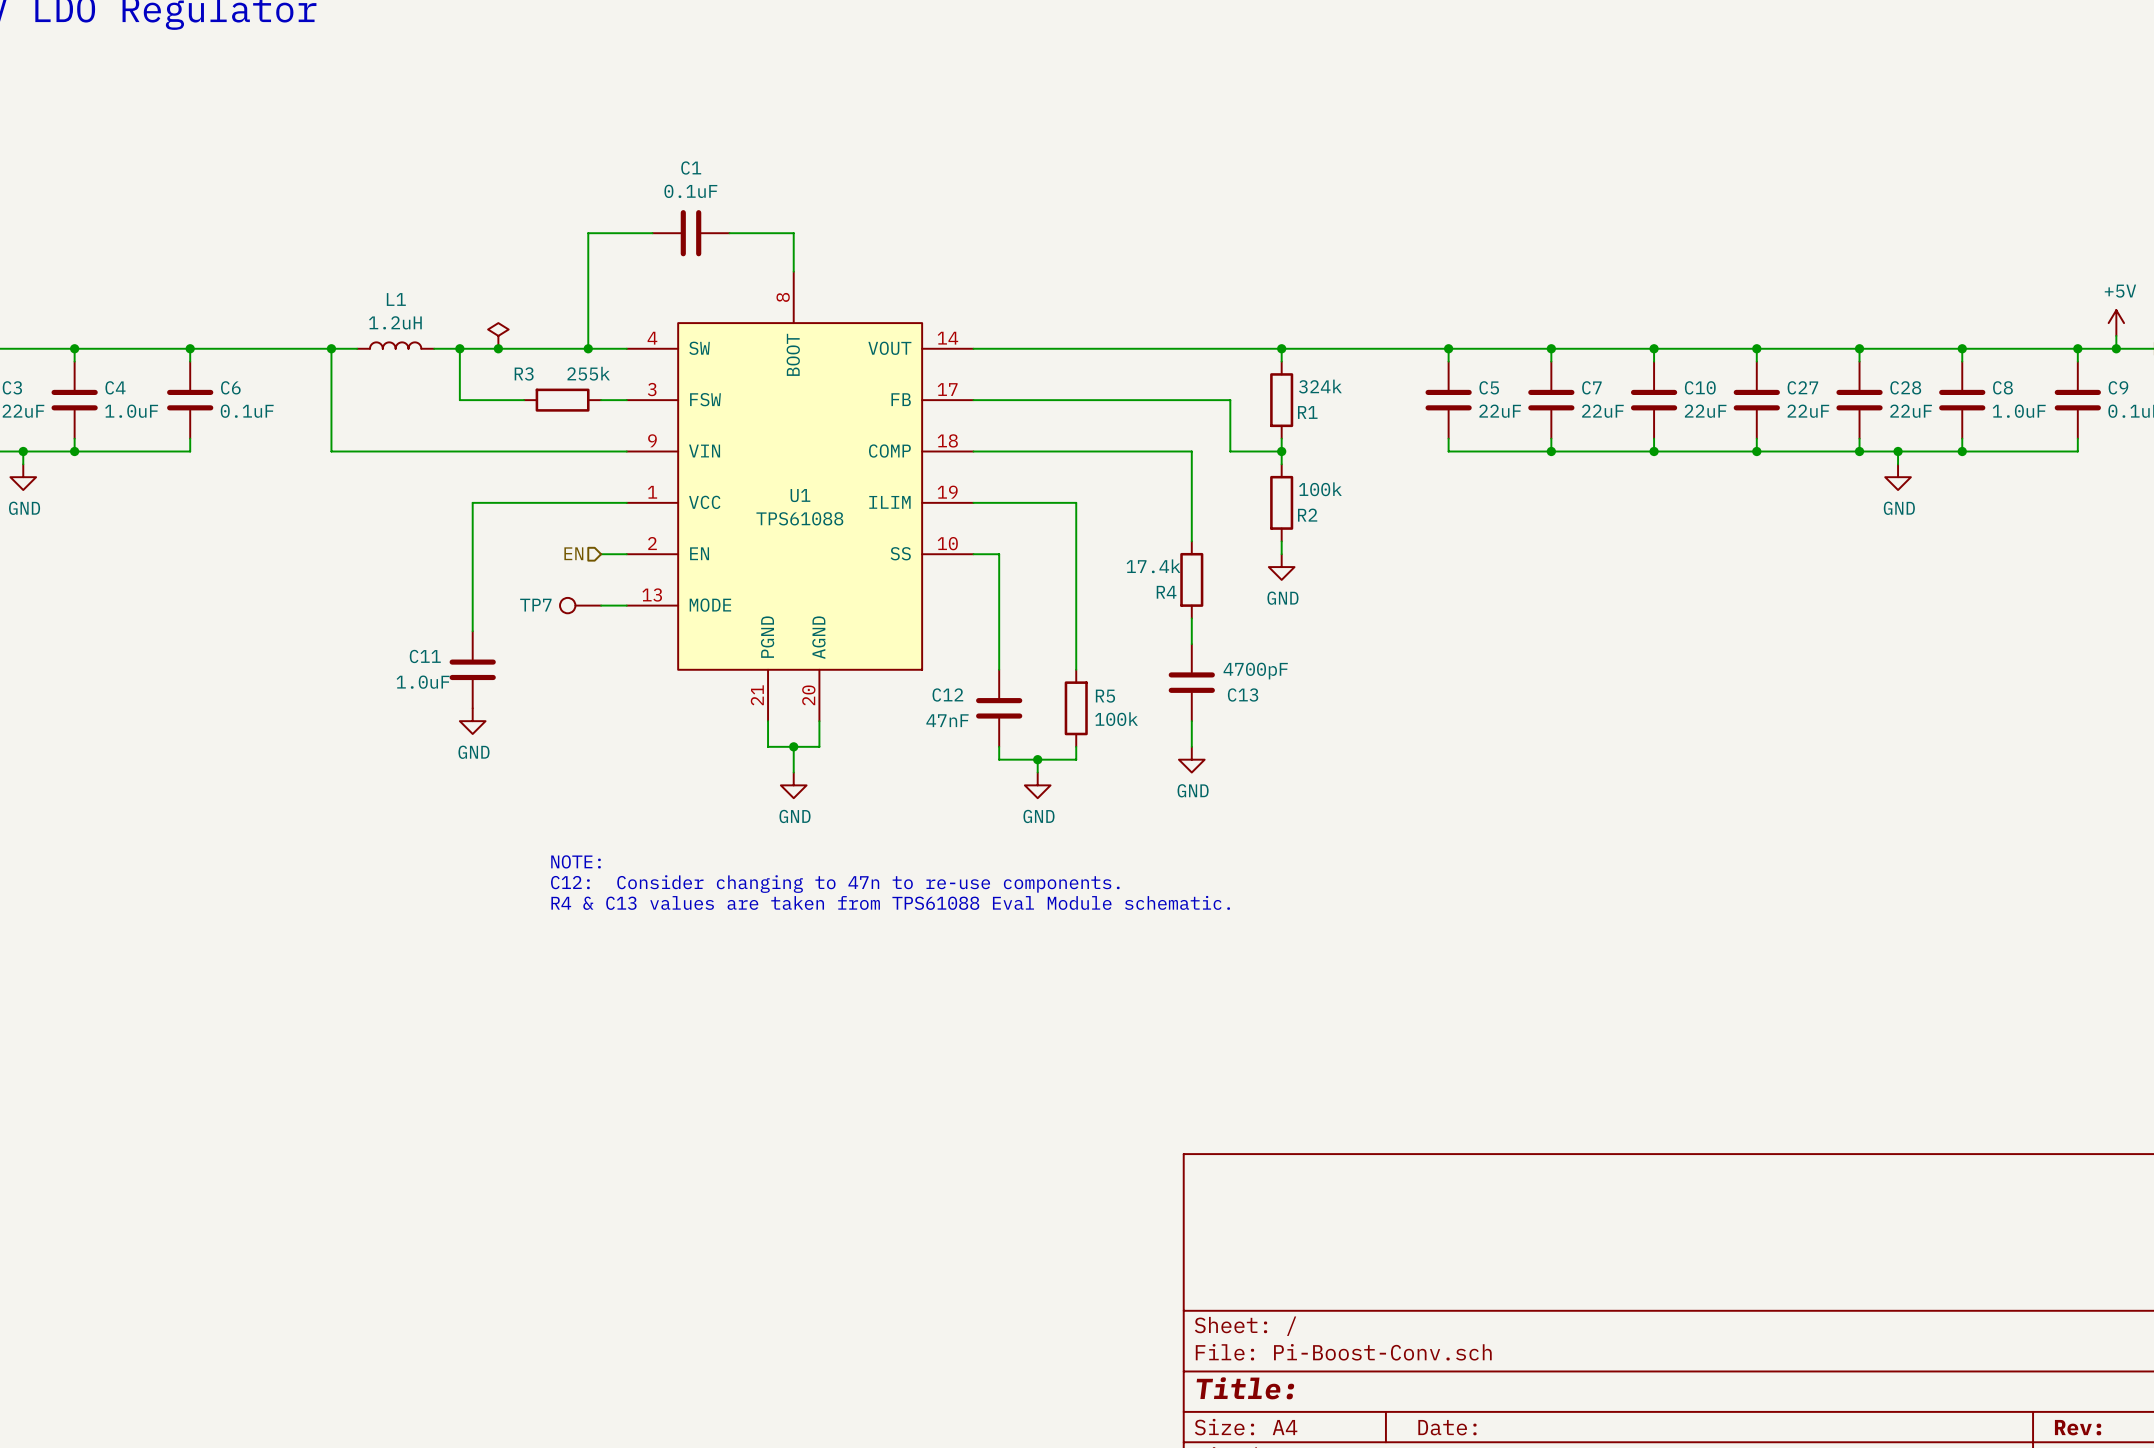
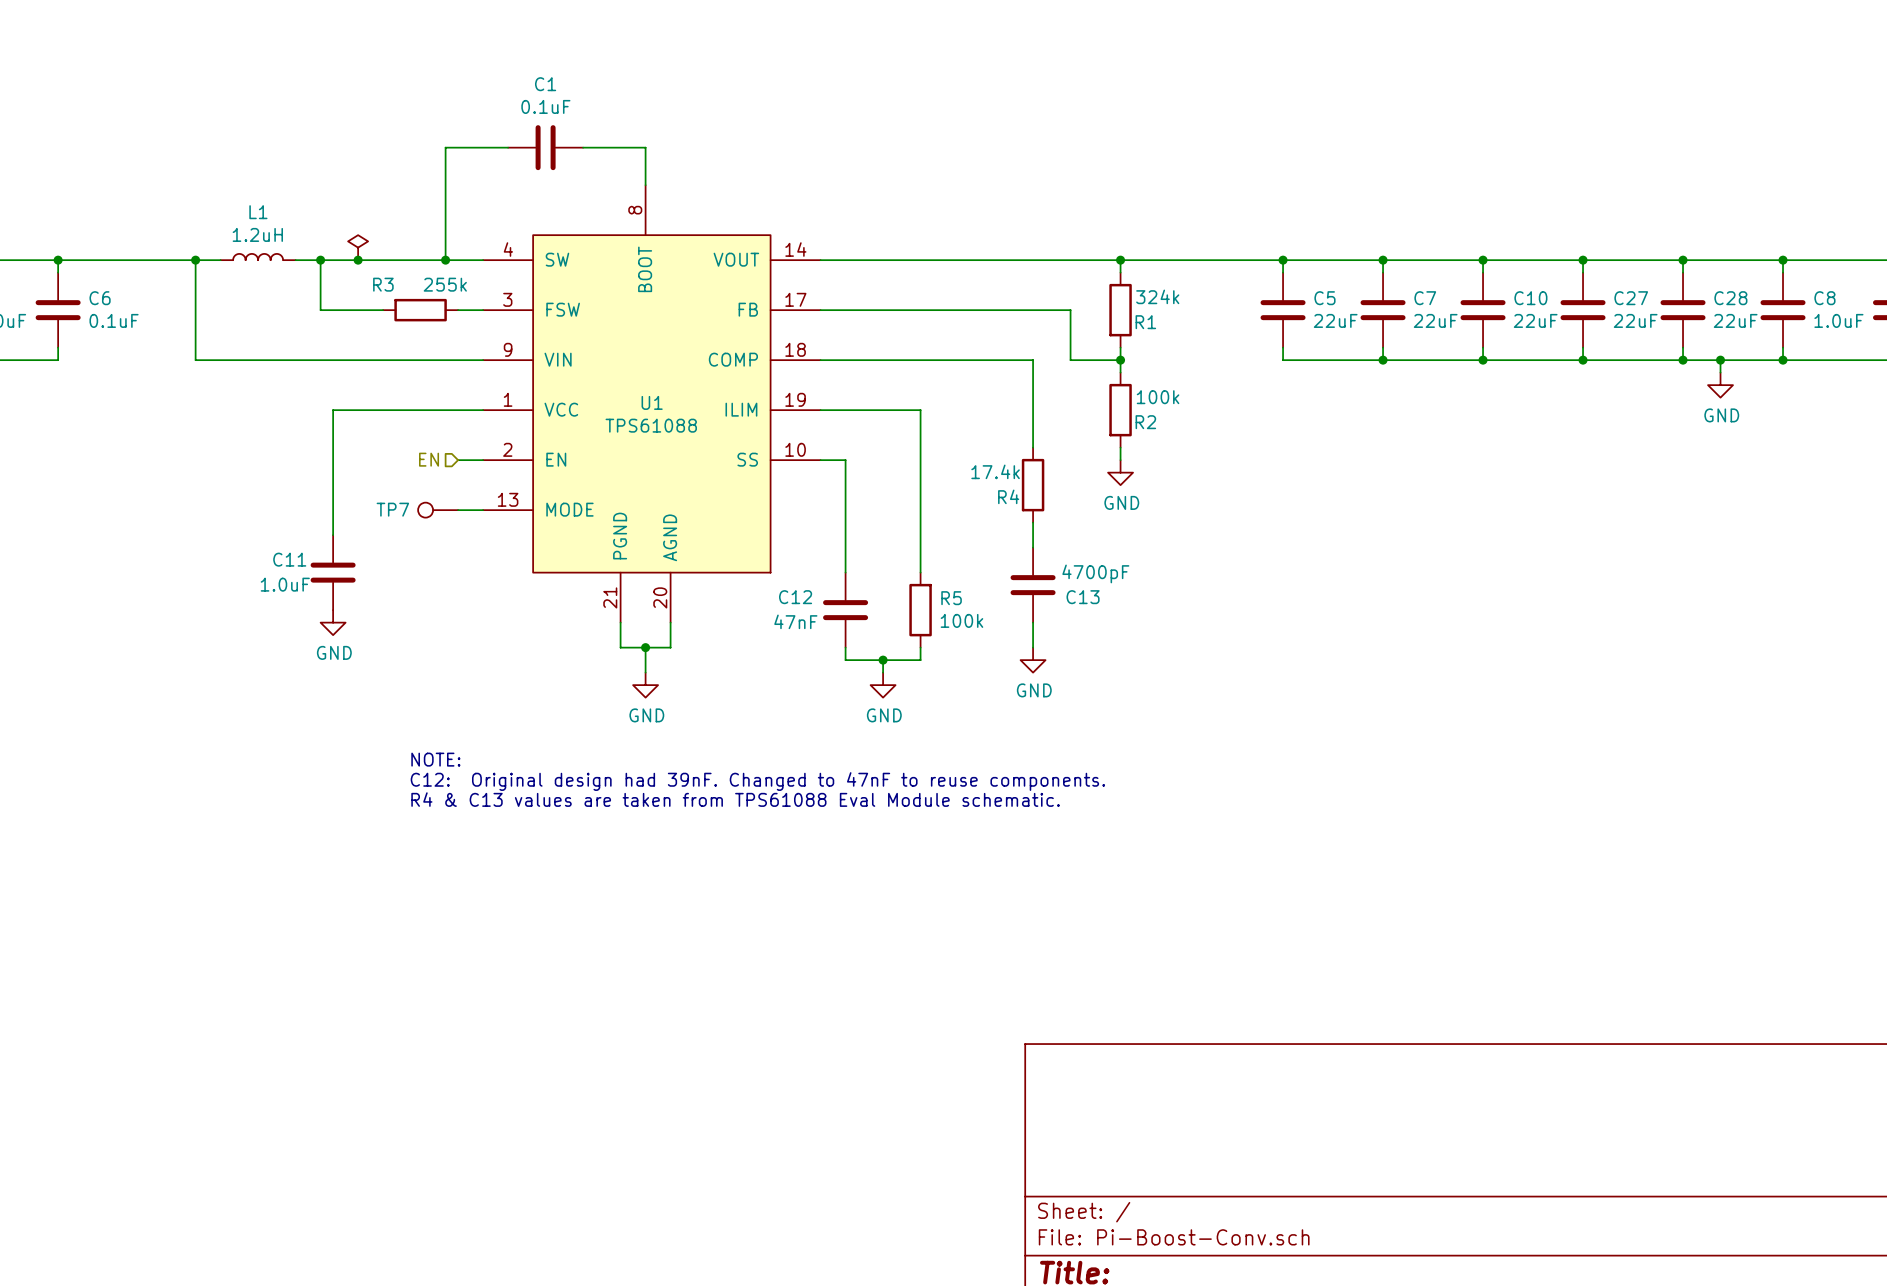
text: C12: Consider changing to 47n to re-use components. (835, 884) -> C12: Original design had 39nF. Changed to 47nF to reuse components. (757, 781)

